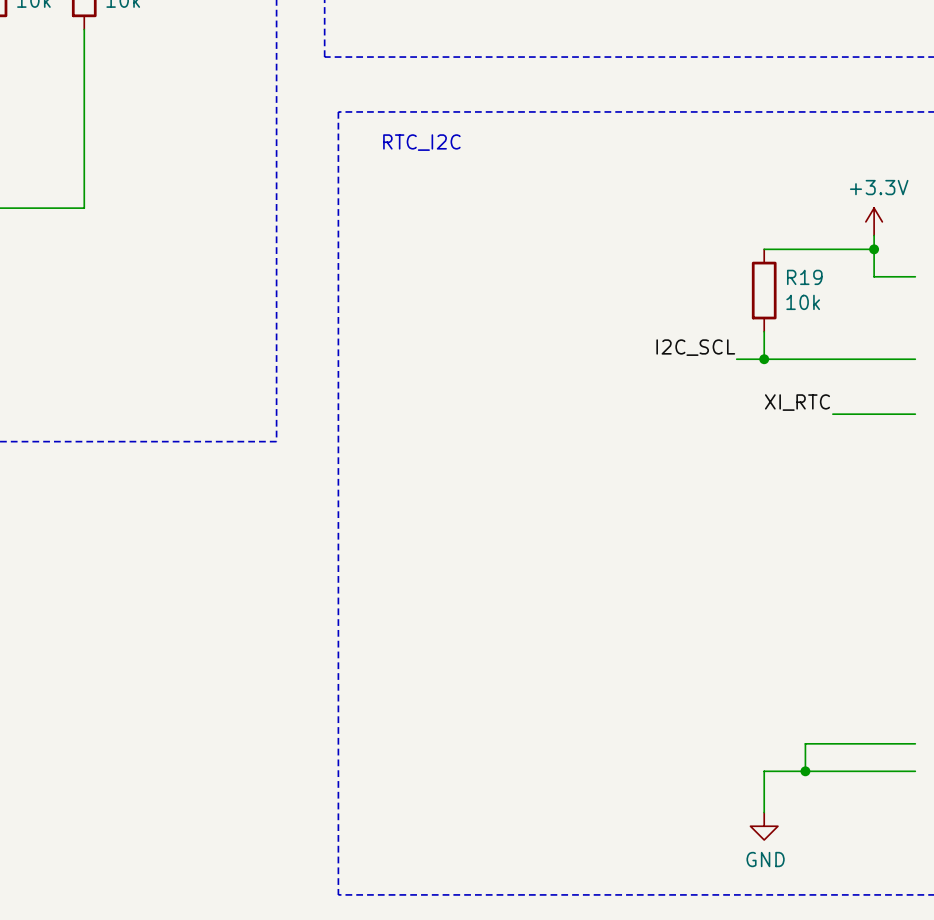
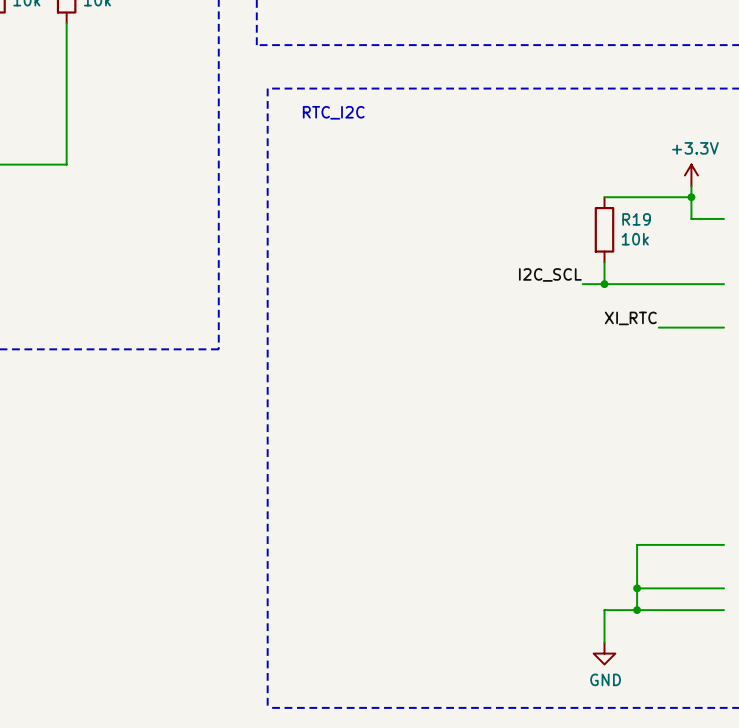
wire: none -> (724, 544) (637, 544) (637, 588)
junction: none -> (637, 588)

